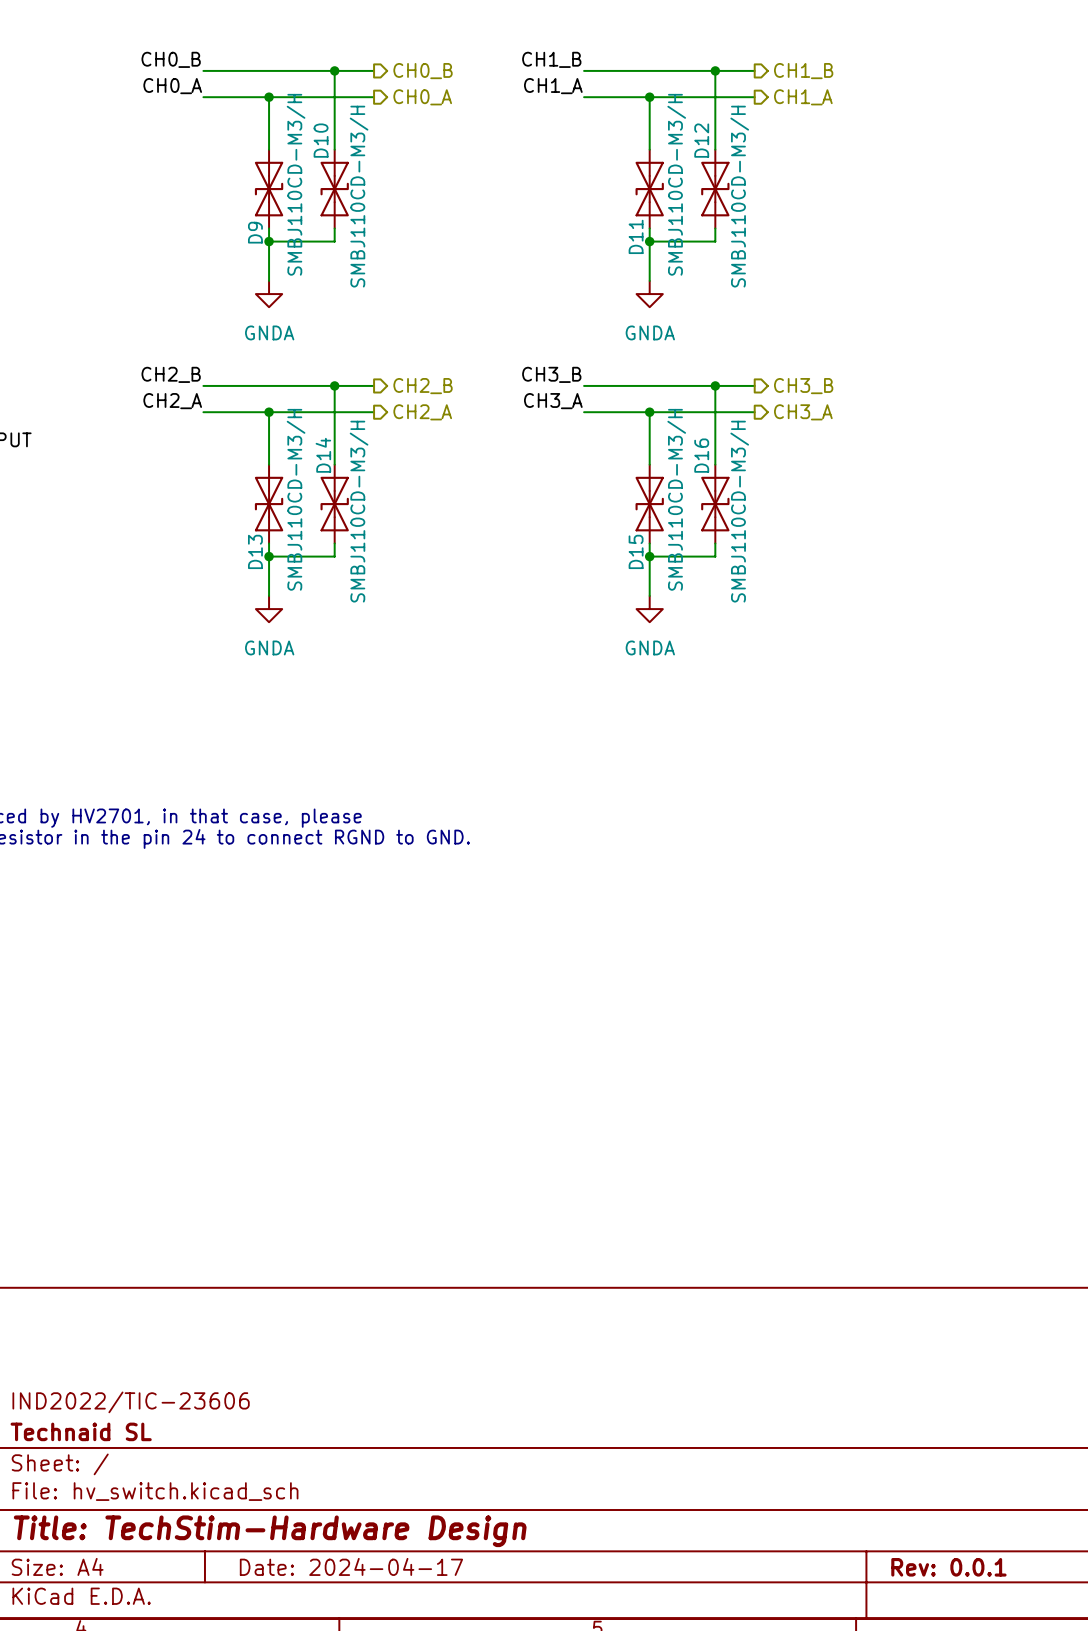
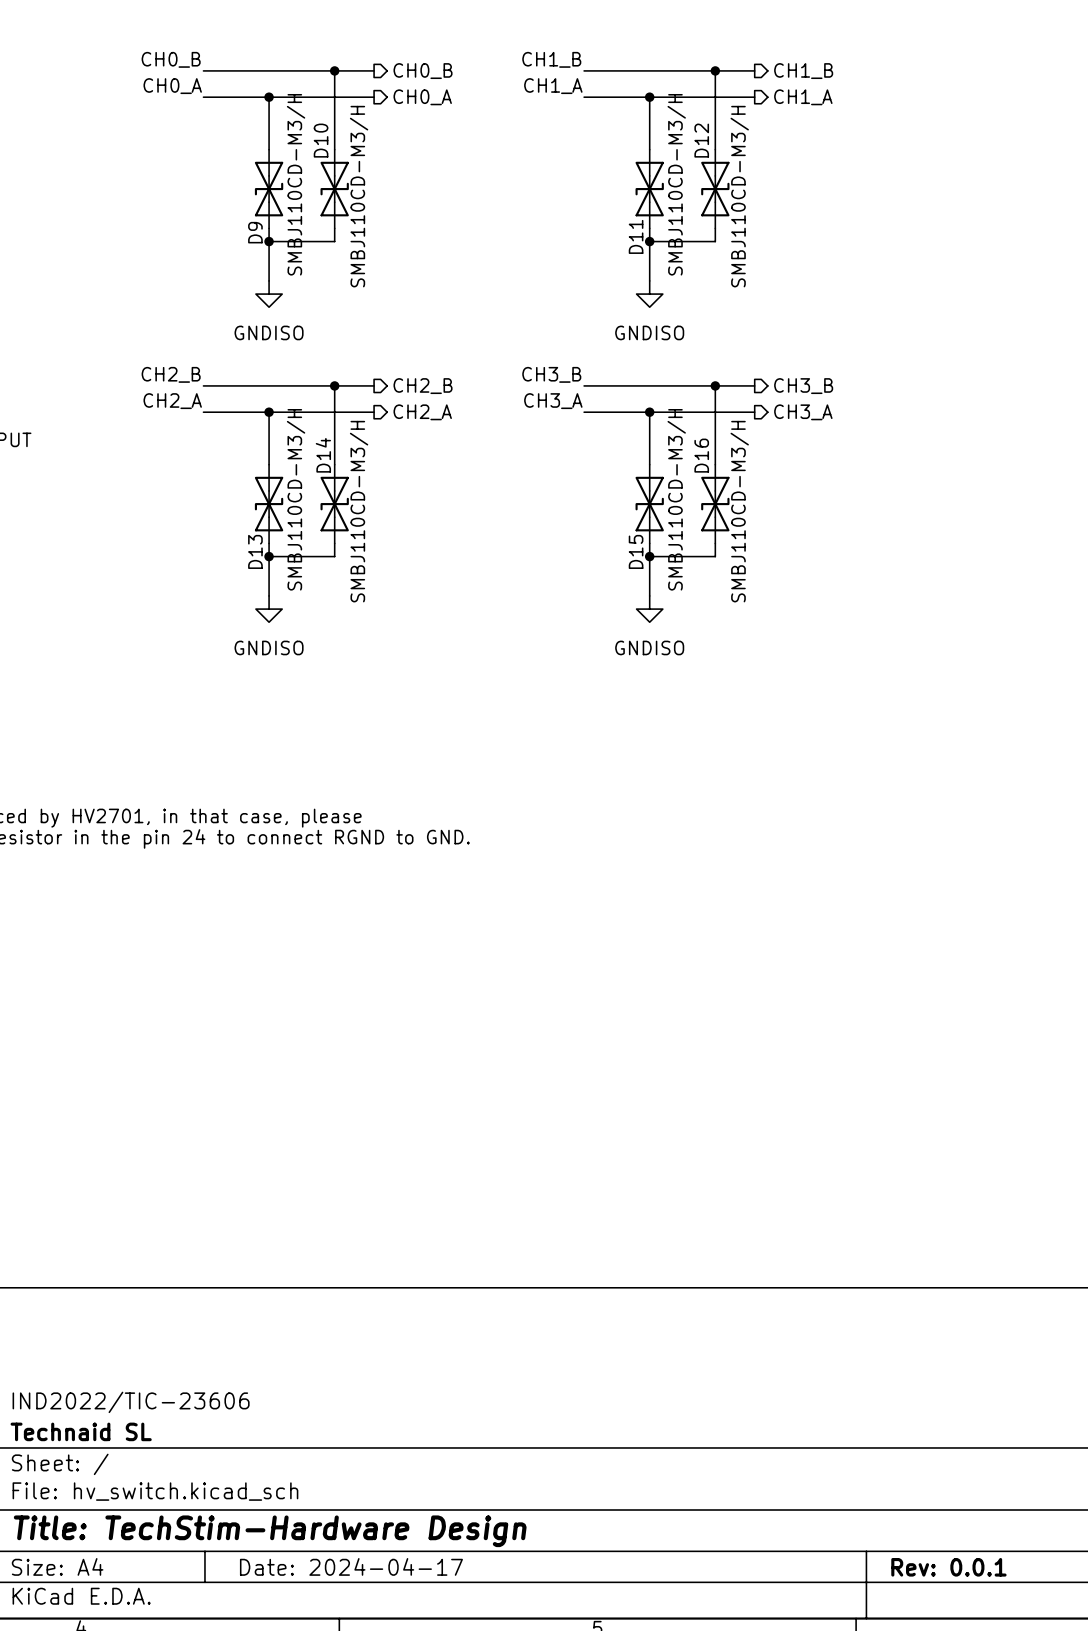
power symbol: GNDA (269, 294) -> GNDISO (269, 294)
power symbol: GNDA (649, 294) -> GNDISO (649, 294)
power symbol: GNDA (269, 609) -> GNDISO (269, 609)
power symbol: GNDA (649, 609) -> GNDISO (649, 609)

